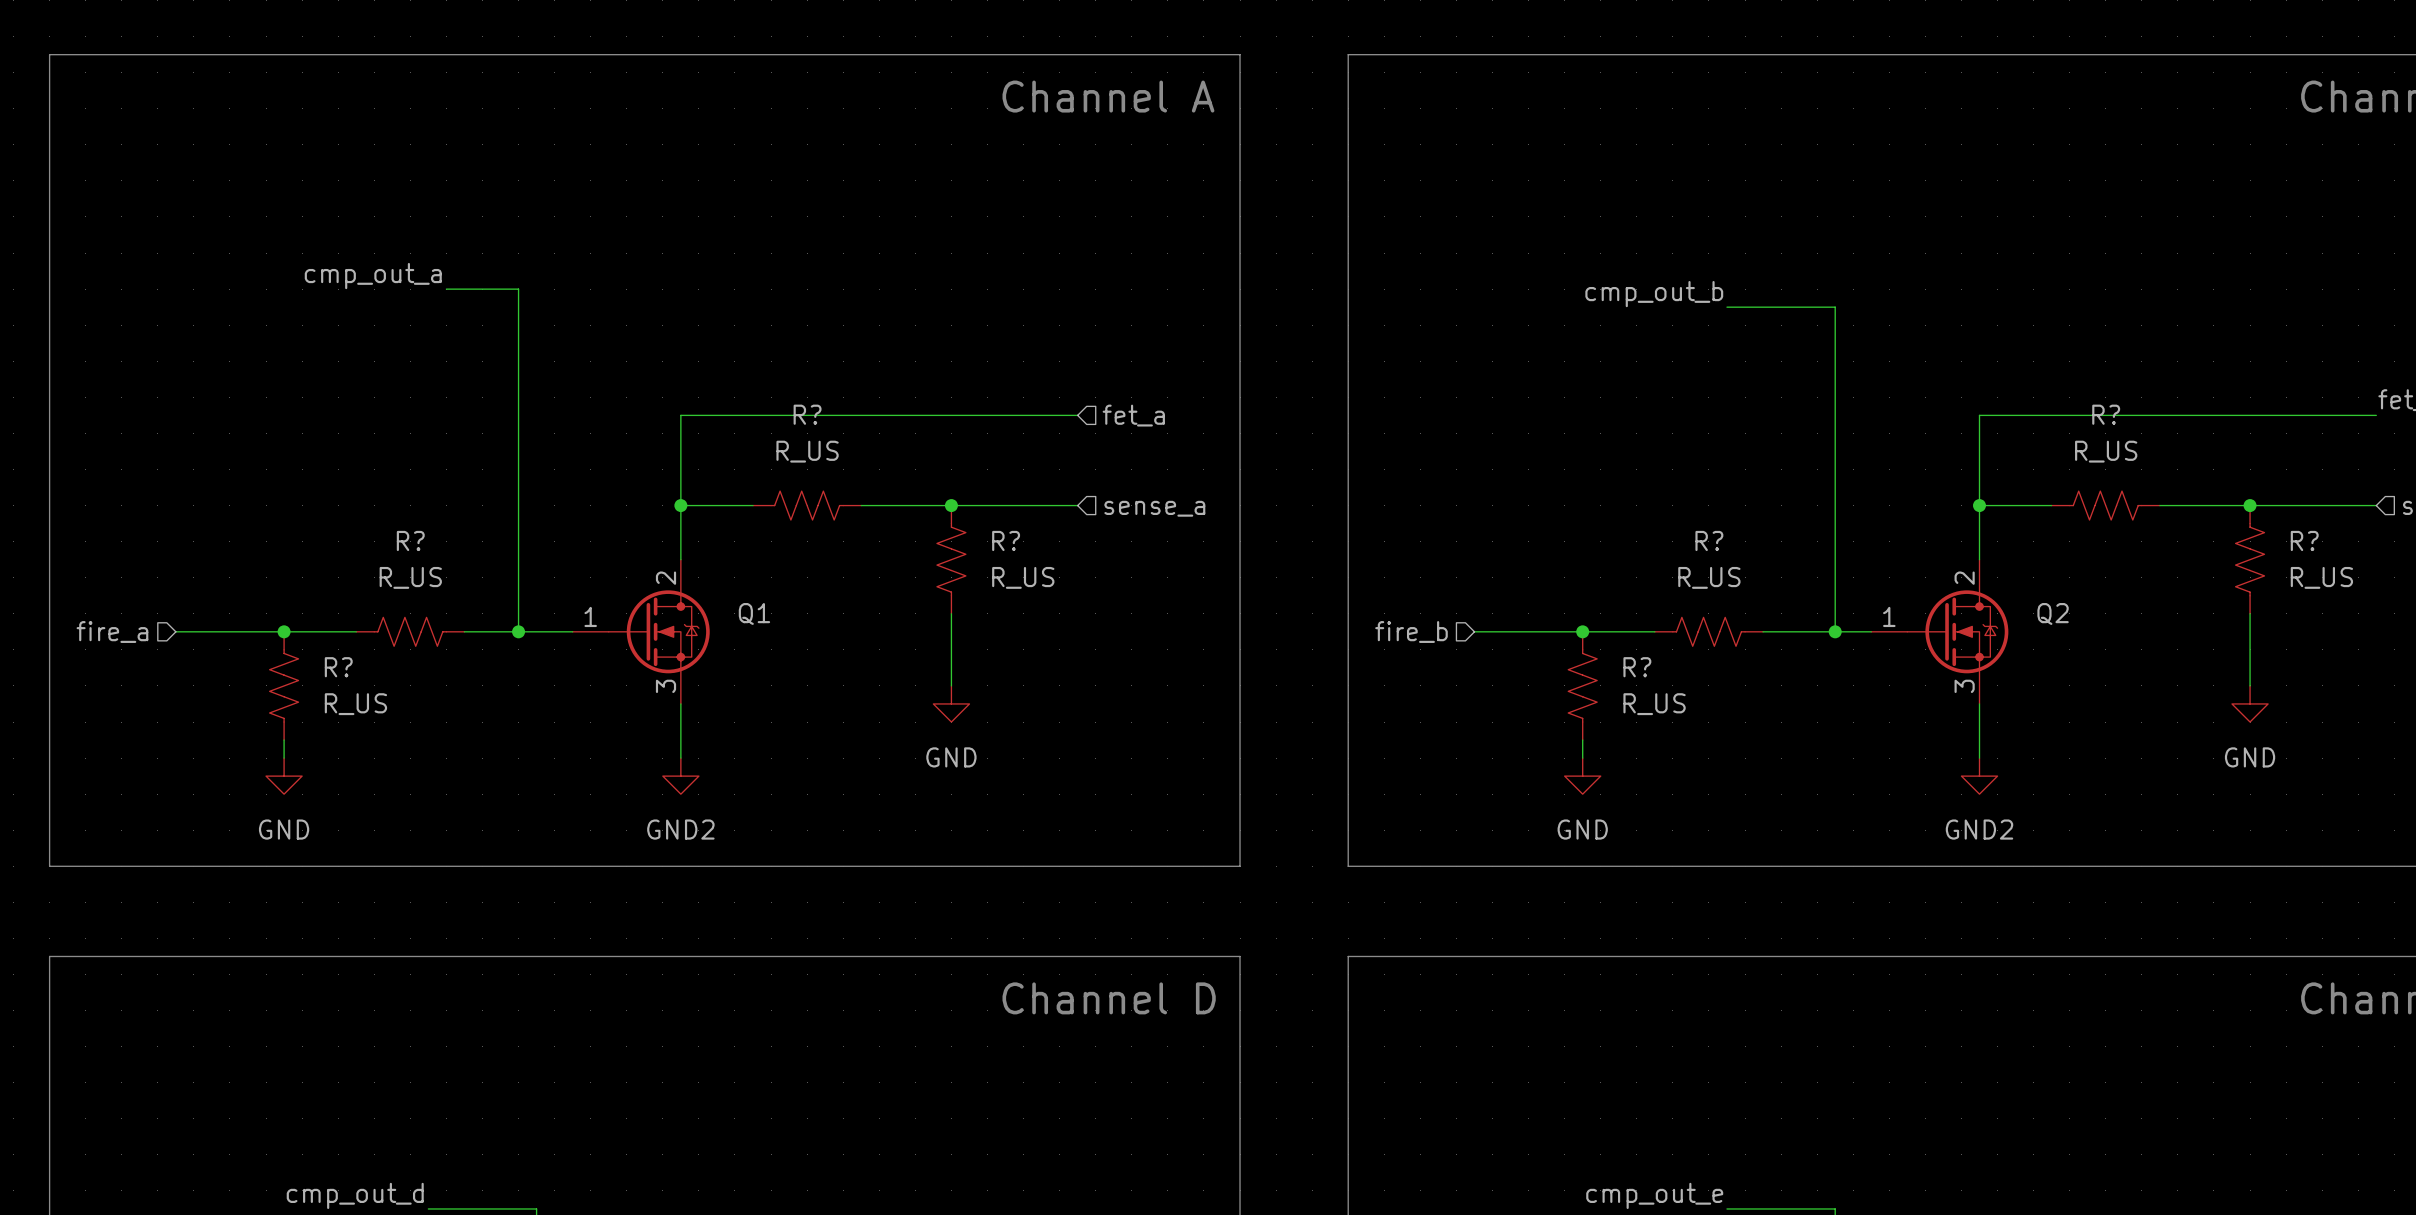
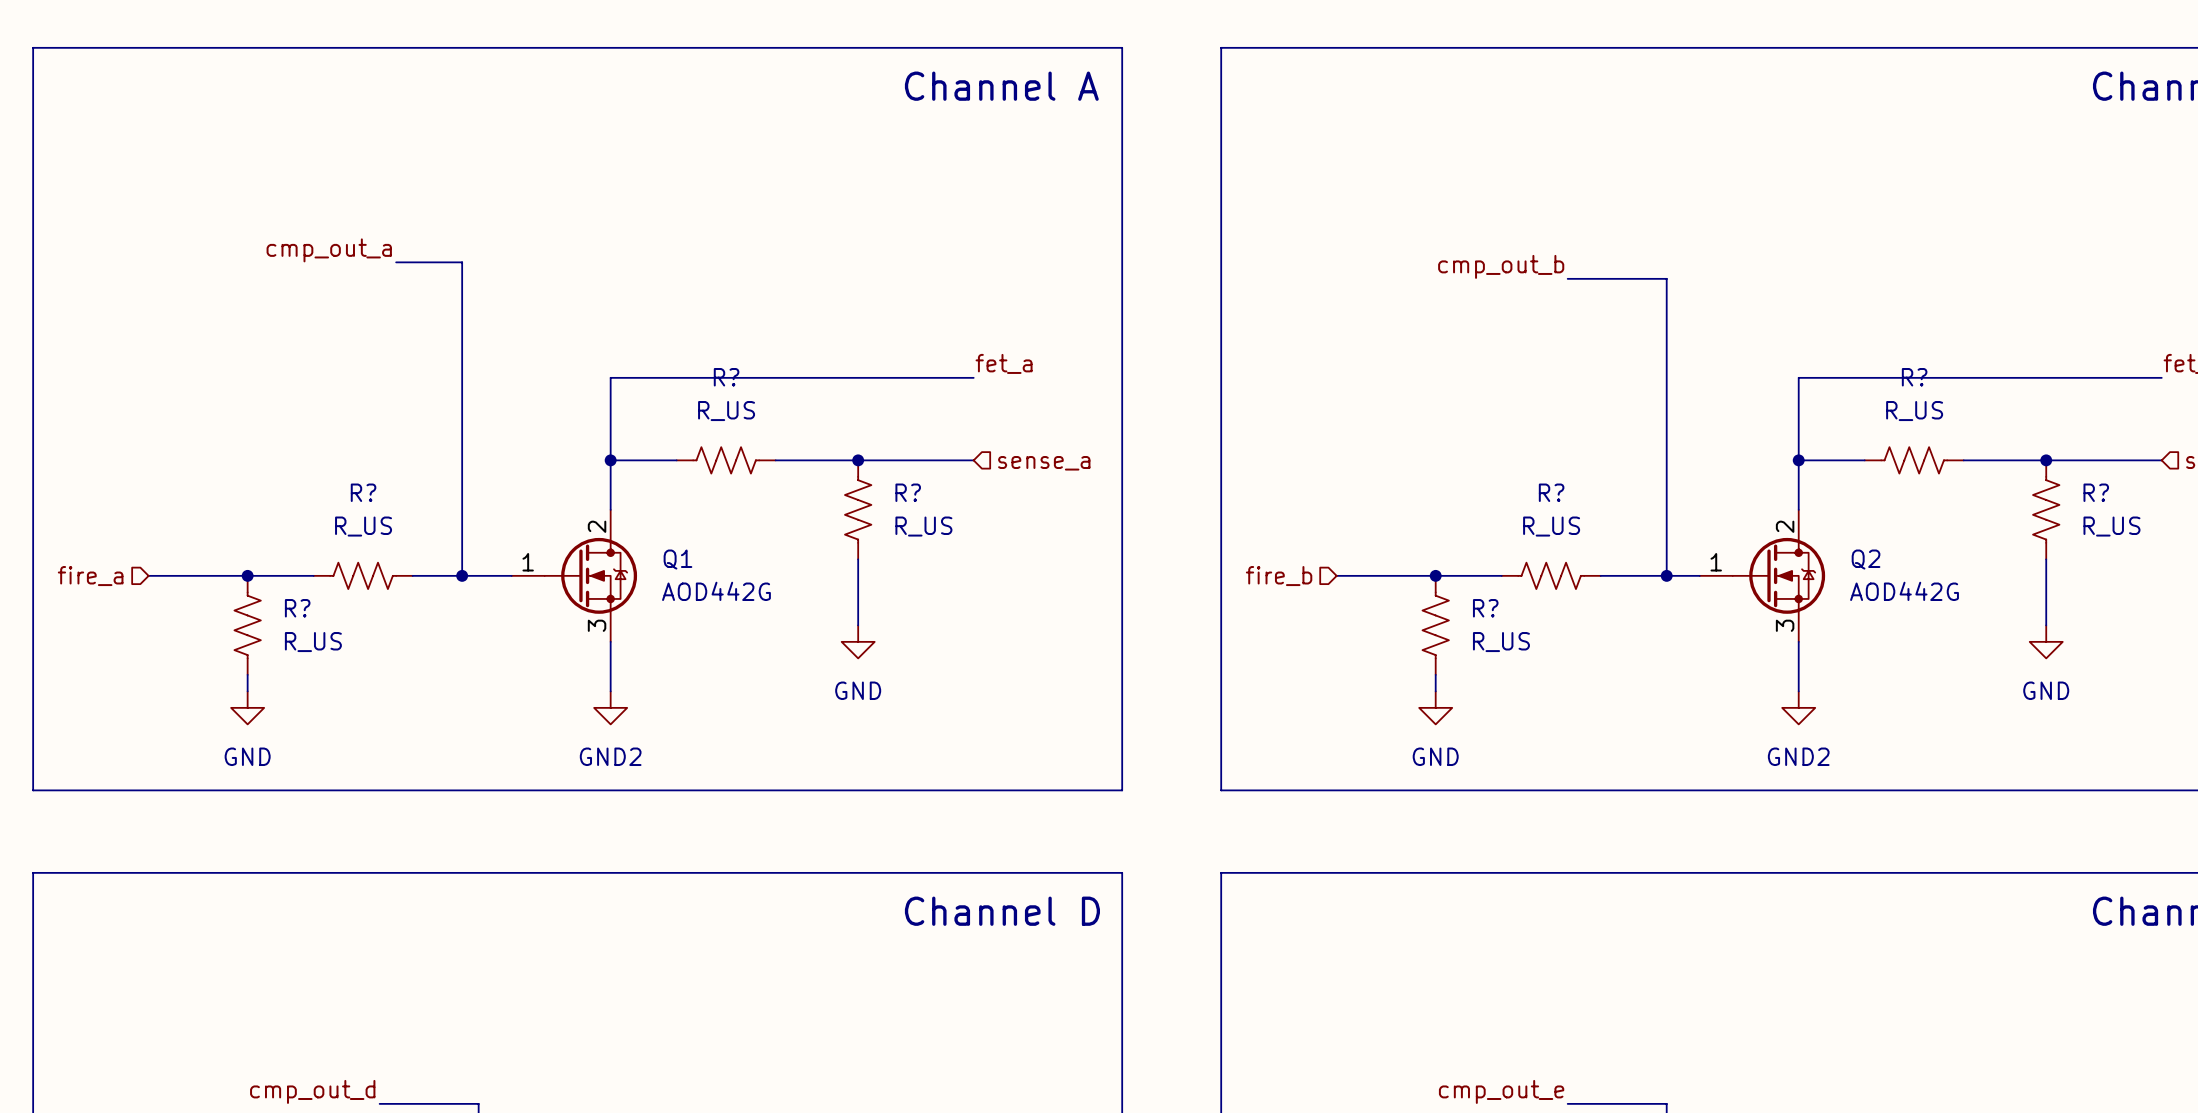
label: none -> fet_a (1004, 363)
hierarchical label: fet_a (1133, 415) -> none
Q1 value: none -> AOD442G (716, 591)
Q2 value: none -> AOD442G (1904, 591)

